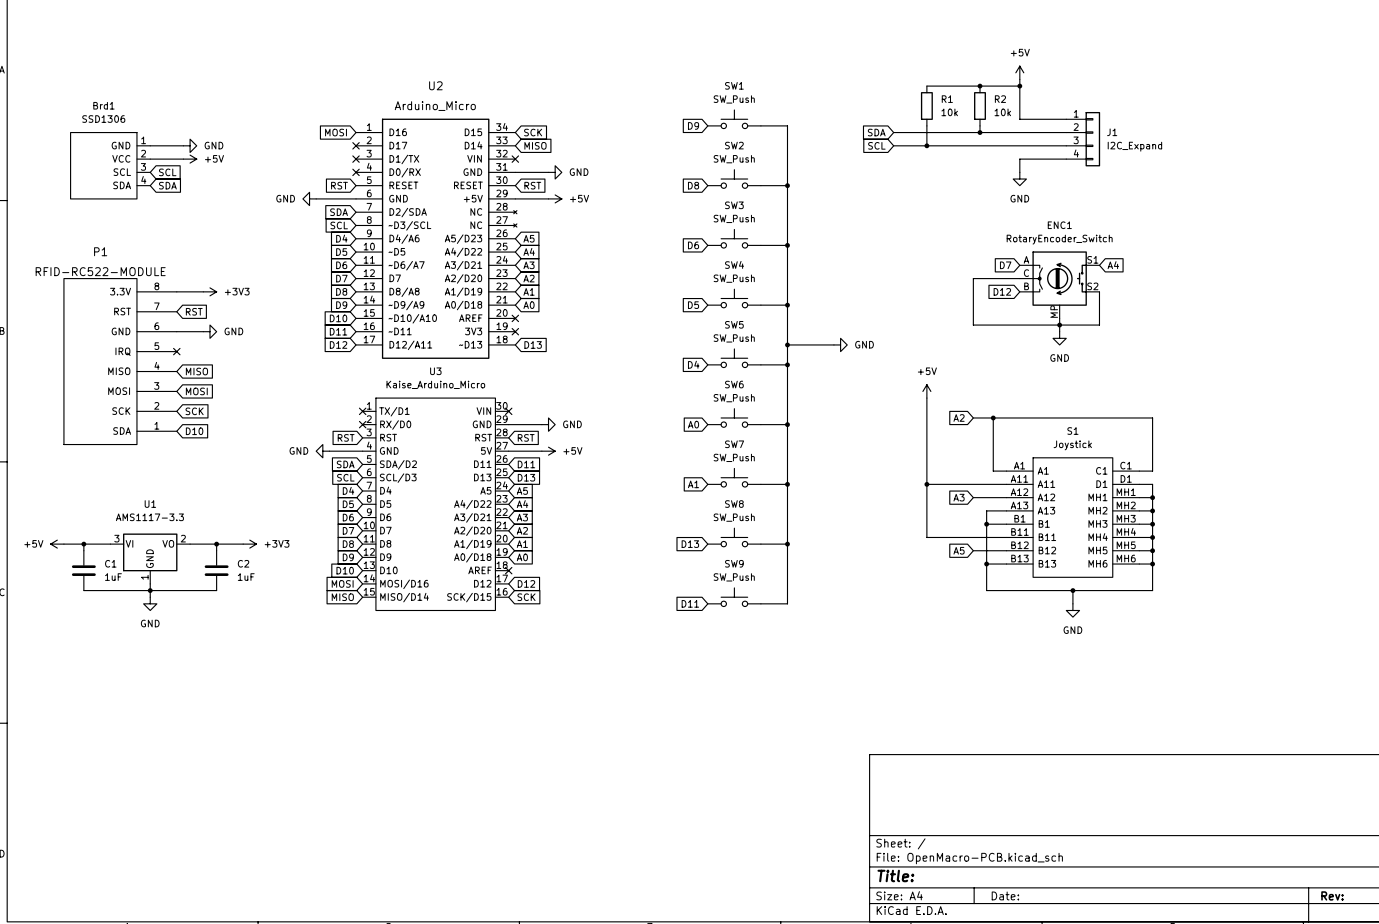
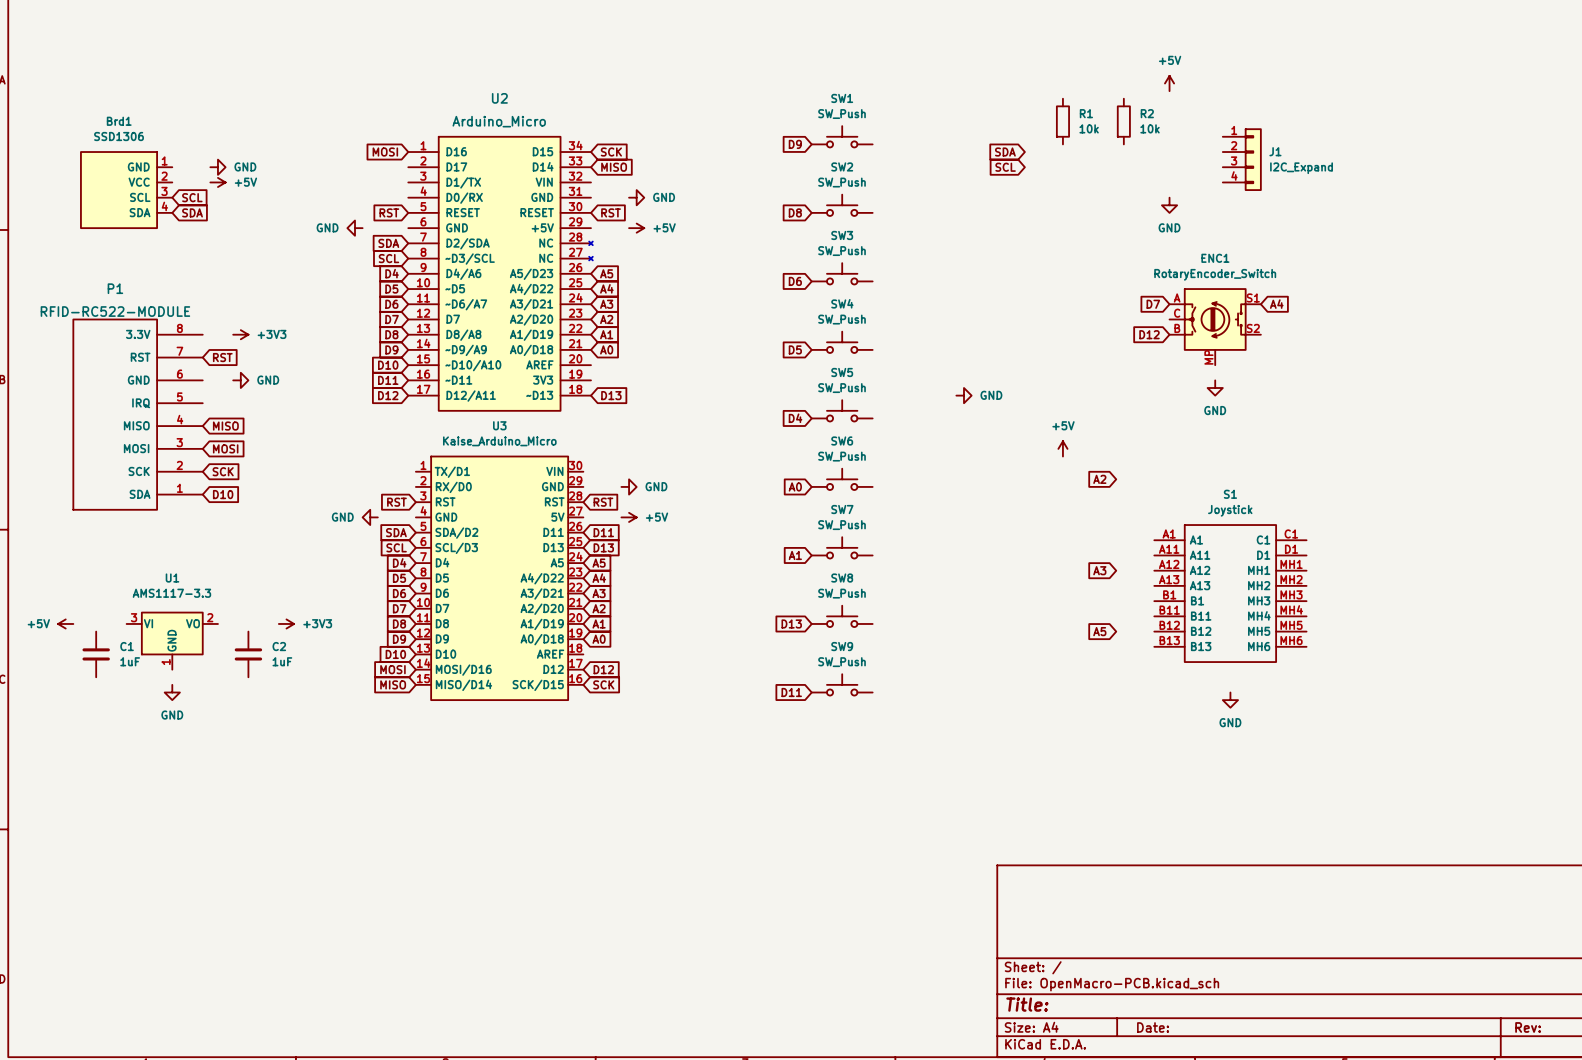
wire: (1019, 79) (1019, 119) (1066, 119) -> none
wire: (926, 86) (1019, 86) -> none
junction: (979, 86) -> none
junction: (1019, 86) -> none
wire: (760, 125) (787, 125) (787, 603) (760, 603) -> none
wire: (926, 125) (926, 145) -> none
wire: (979, 125) (979, 132) -> none
wire: (893, 132) (1066, 132) -> none
junction: (979, 132) -> none
wire: (150, 145) (183, 145) -> none
no-connect mark: (356, 145) -> none
wire: (893, 145) (1066, 145) -> none
junction: (926, 145) -> none
wire: (150, 159) (183, 159) -> none
no-connect mark: (356, 159) -> none
no-connect mark: (515, 159) -> none
wire: (1066, 159) (1019, 159) (1019, 172) -> none
no-connect mark: (356, 172) -> none
wire: (515, 172) (548, 172) -> none
wire: (760, 185) (787, 185) -> none
junction: (787, 185) -> none
wire: (316, 198) (356, 198) -> none
wire: (515, 198) (548, 198) -> none
wire: (760, 245) (787, 245) -> none
junction: (787, 245) -> none
wire: (1019, 278) (973, 278) (973, 325) (1099, 325) (1099, 291) -> none
wire: (176, 291) (203, 291) -> none
wire: (760, 305) (787, 305) -> none
junction: (787, 305) -> none
no-connect mark: (515, 318) -> none
wire: (1059, 318) (1059, 331) -> none
junction: (1059, 325) -> none
wire: (176, 331) (203, 331) -> none
no-connect mark: (515, 331) -> none
wire: (787, 344) (833, 344) -> none
junction: (787, 344) -> none
no-connect mark: (176, 351) -> none
wire: (760, 364) (787, 364) -> none
junction: (787, 364) -> none
wire: (926, 398) (926, 537) (1006, 537) -> none
no-connect mark: (362, 411) -> none
no-connect mark: (508, 411) -> none
wire: (973, 417) (1152, 417) (1152, 471) (1139, 471) -> none
wire: (993, 417) (993, 471) (1006, 471) -> none
junction: (993, 417) -> none
no-connect mark: (362, 424) -> none
wire: (508, 424) (541, 424) -> none
wire: (760, 424) (787, 424) -> none
junction: (787, 424) -> none
wire: (329, 451) (362, 451) -> none
wire: (508, 451) (541, 451) -> none
wire: (760, 484) (787, 484) -> none
junction: (787, 484) -> none
wire: (926, 484) (1006, 484) -> none
junction: (926, 484) -> none
wire: (1139, 484) (1152, 484) (1152, 590) (986, 590) (986, 510) (1006, 510) -> none
wire: (973, 497) (1006, 497) -> none
wire: (1139, 497) (1152, 497) -> none
junction: (1152, 497) -> none
wire: (1139, 510) (1152, 510) -> none
junction: (1152, 510) -> none
wire: (986, 524) (1006, 524) -> none
junction: (986, 524) -> none
wire: (1139, 524) (1152, 524) -> none
junction: (1152, 524) -> none
wire: (1139, 537) (1152, 537) -> none
junction: (1152, 537) -> none
wire: (63, 544) (110, 544) -> none
wire: (83, 544) (83, 550) -> none
junction: (83, 544) -> none
wire: (190, 544) (243, 544) -> none
wire: (216, 544) (216, 550) -> none
junction: (216, 544) -> none
wire: (760, 544) (787, 544) -> none
junction: (787, 544) -> none
wire: (973, 550) (1006, 550) -> none
wire: (1139, 550) (1152, 550) -> none
junction: (1152, 550) -> none
wire: (986, 564) (1006, 564) -> none
junction: (986, 564) -> none
wire: (1139, 564) (1152, 564) -> none
junction: (1152, 564) -> none
no-connect mark: (508, 570) -> none
wire: (150, 583) (150, 597) -> none
wire: (83, 590) (216, 590) -> none
junction: (150, 590) -> none
wire: (1072, 590) (1072, 603) -> none
junction: (1072, 590) -> none

